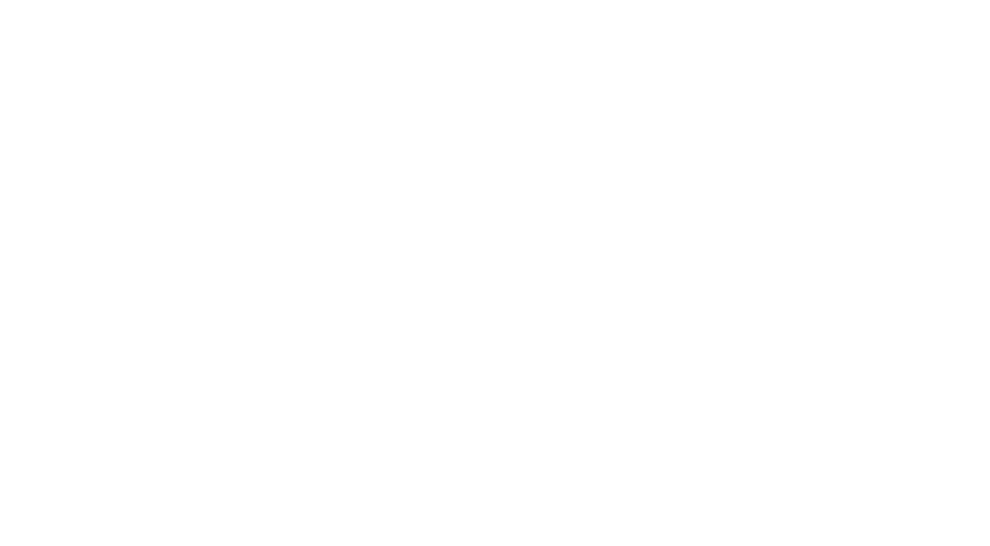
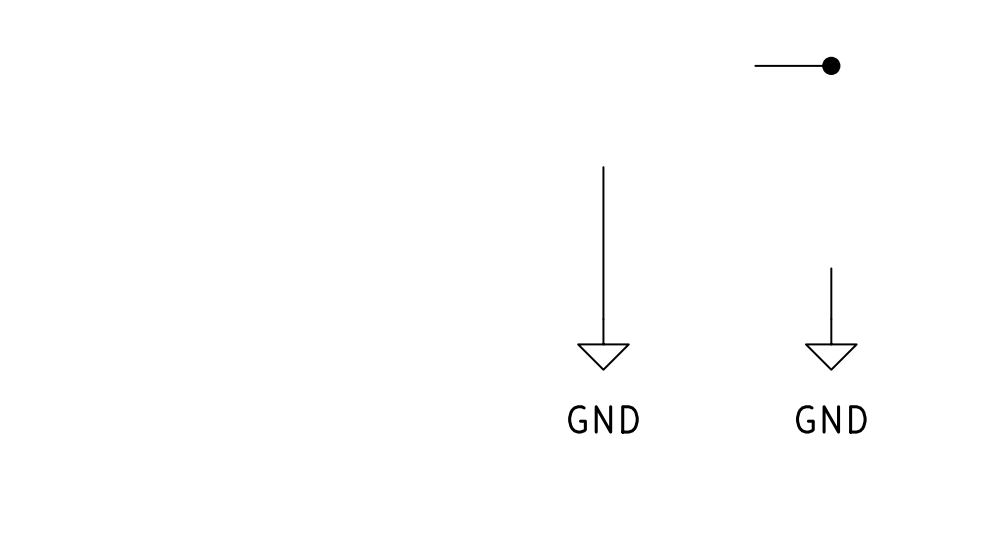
wire: none -> (755, 65) (831, 65)
junction: none -> (831, 65)
wire: none -> (603, 167) (603, 319)
wire: none -> (831, 268) (831, 319)
power symbol: none -> GND (603, 344)
power symbol: none -> GND (831, 344)

